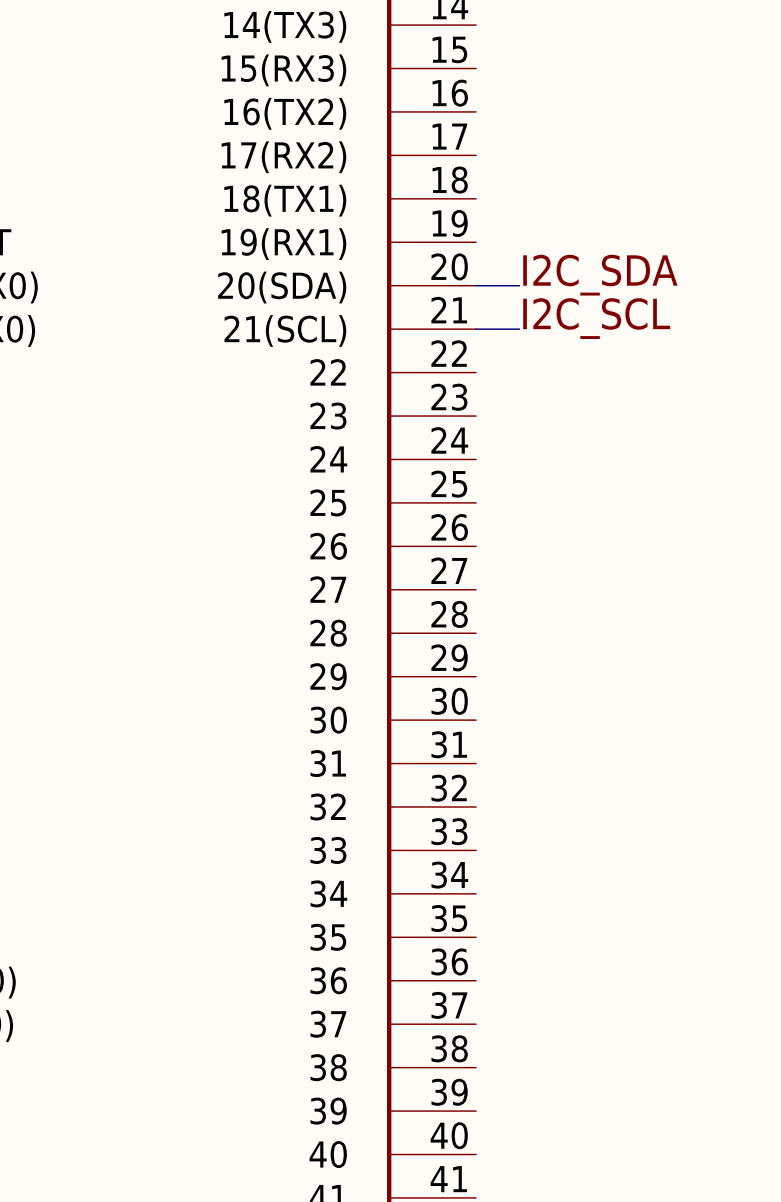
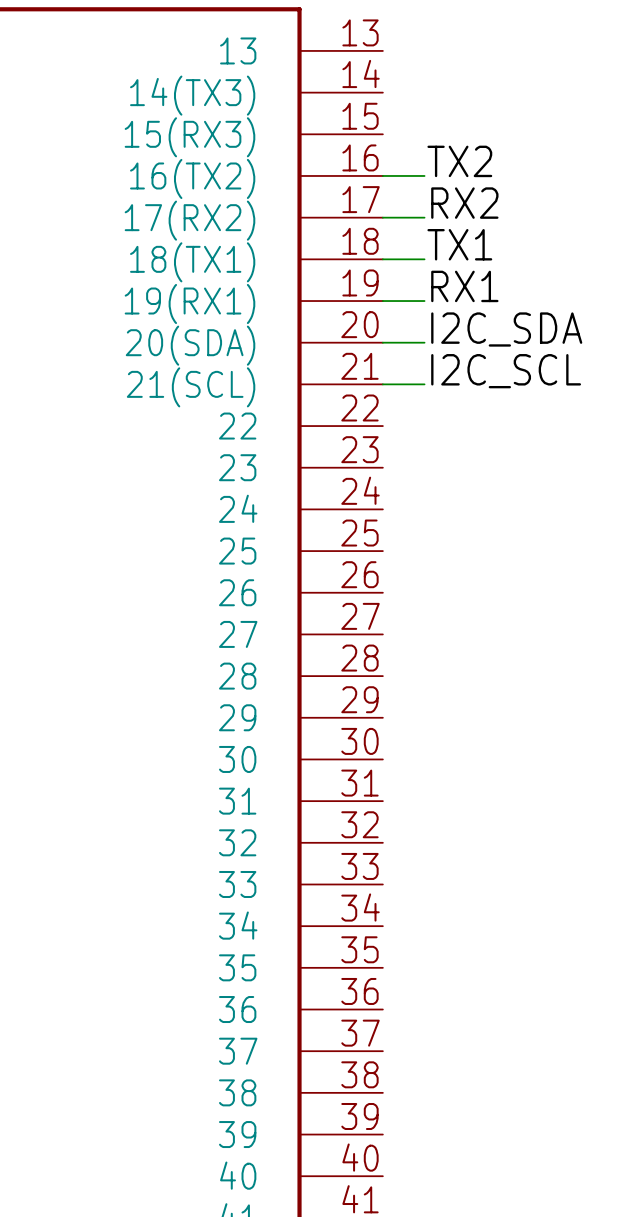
label: none -> TX2 (459, 161)
wire: none -> (382, 175) (424, 175)
label: none -> RX2 (464, 203)
wire: none -> (382, 217) (424, 217)
label: none -> TX1 (459, 244)
wire: none -> (382, 259) (424, 259)
label: none -> RX1 (464, 286)
wire: none -> (382, 301) (424, 301)

